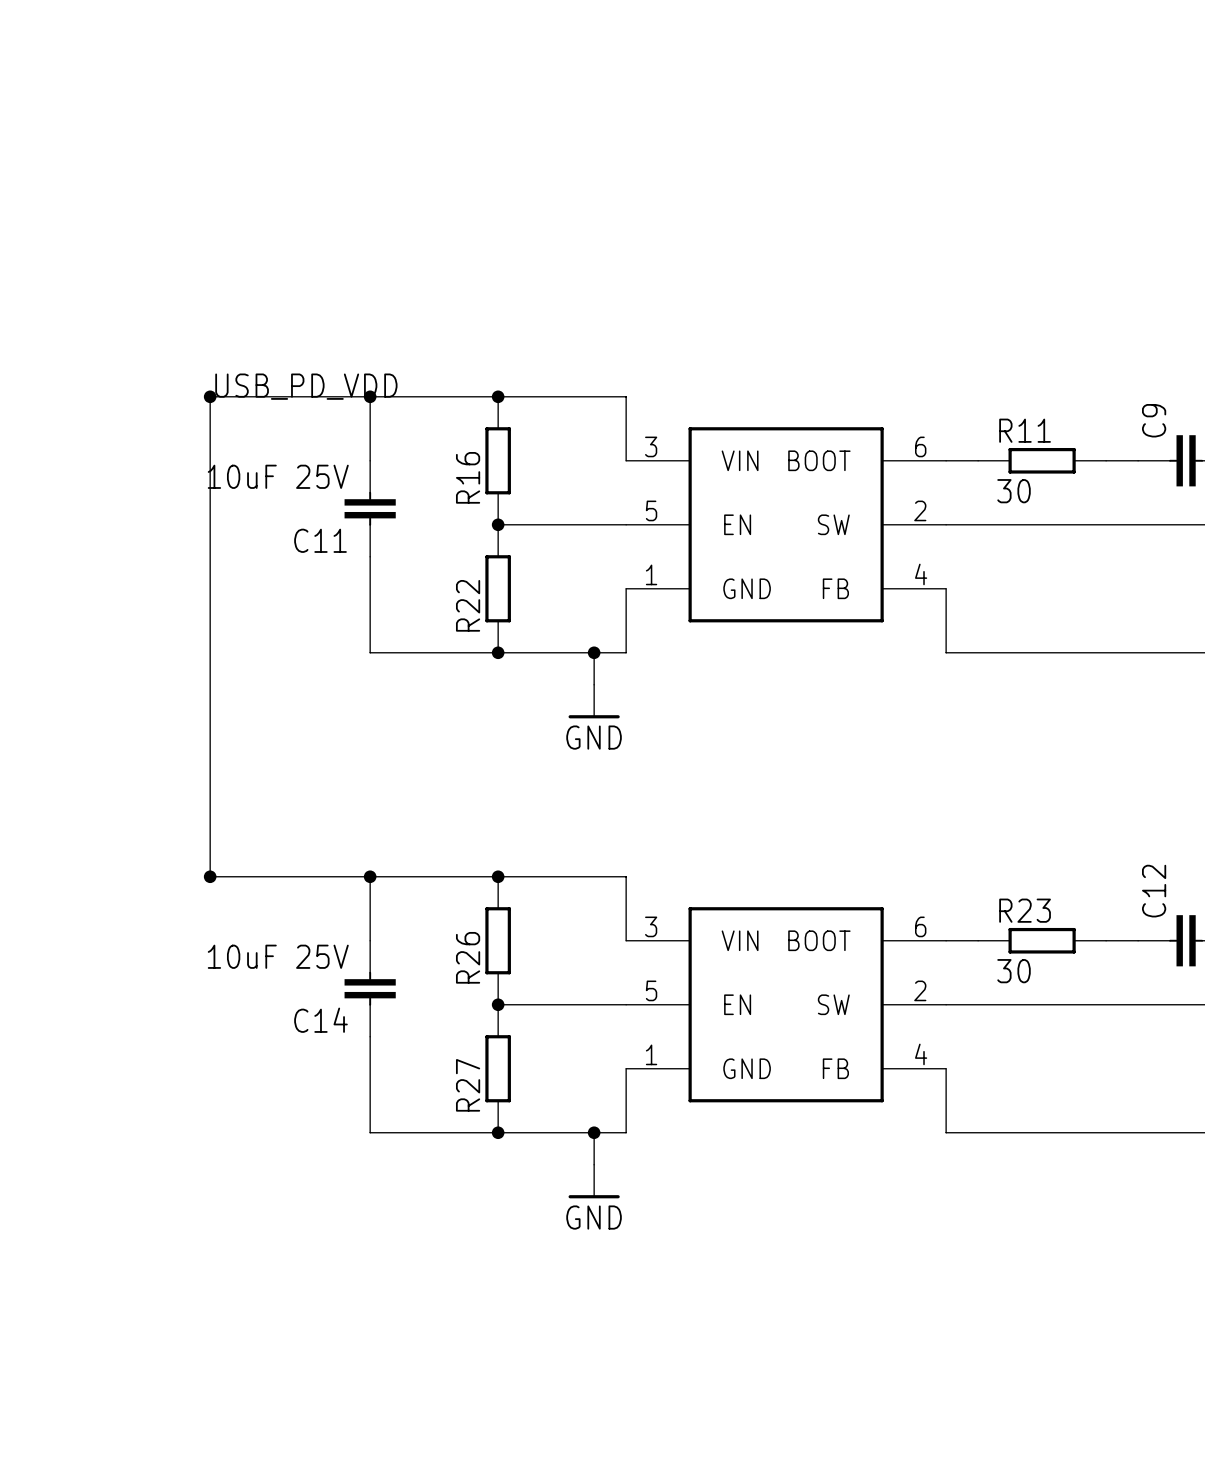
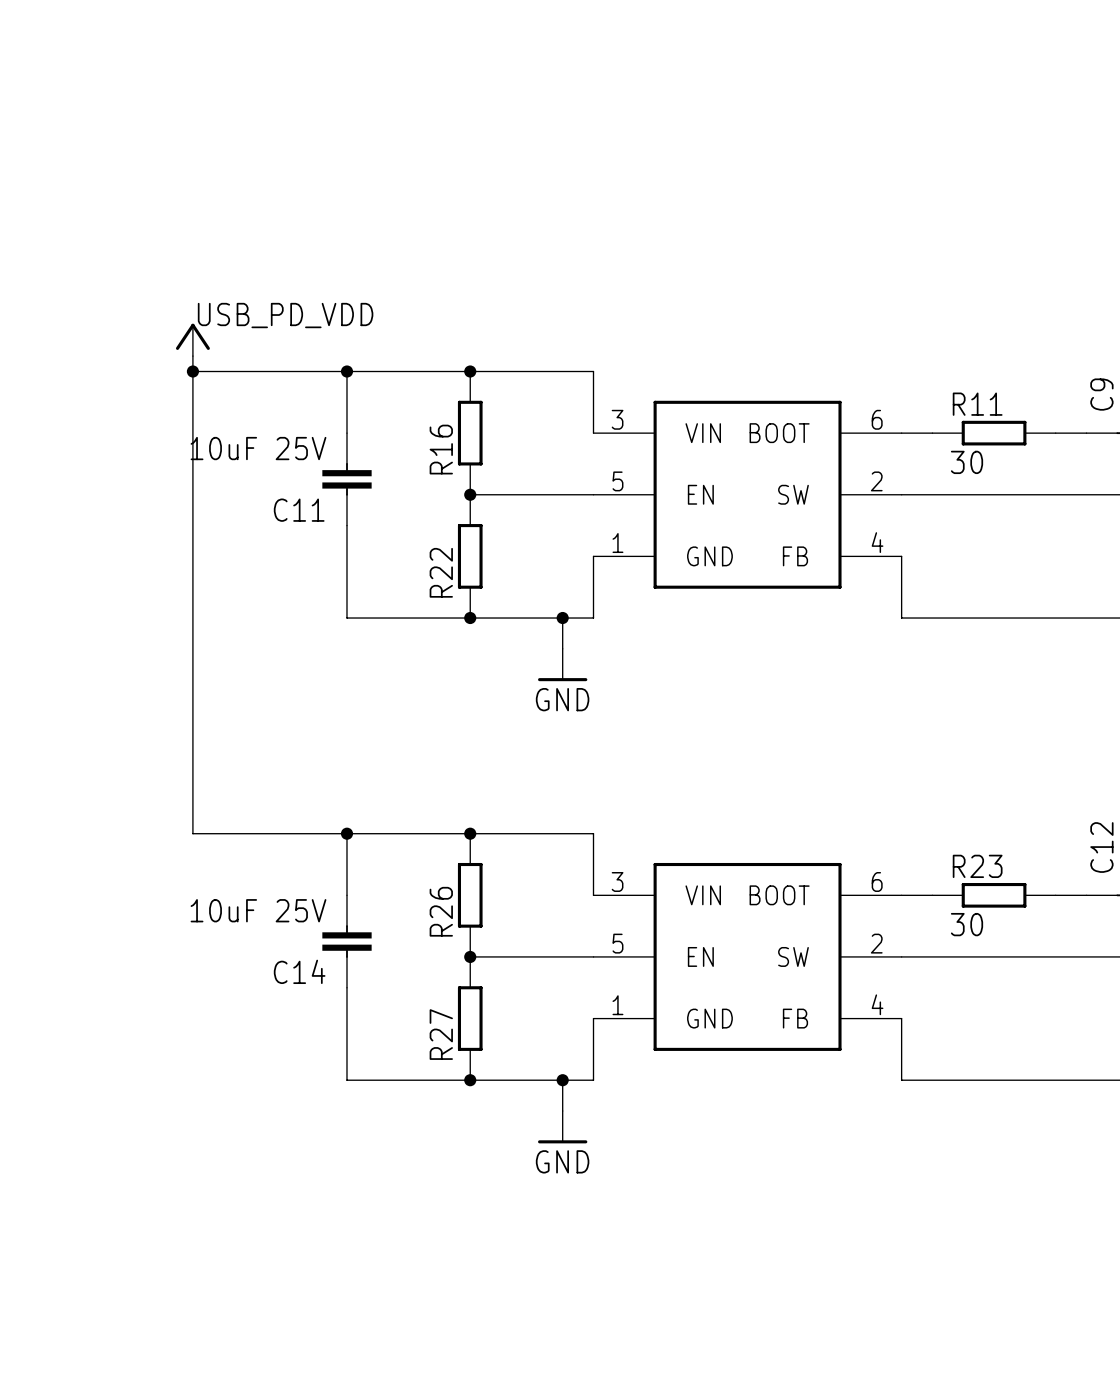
power symbol: none -> USB_PD_VDD (192, 339)
wire: none -> (192, 356) (192, 371)
label: USB_PD_VDD (306, 386) -> none
junction: (210, 876) -> none

